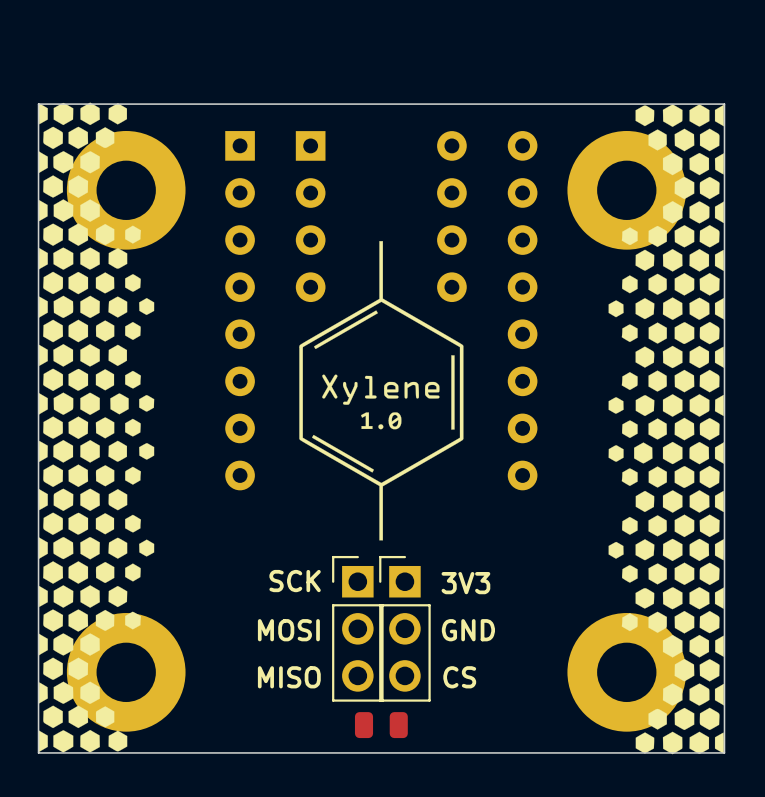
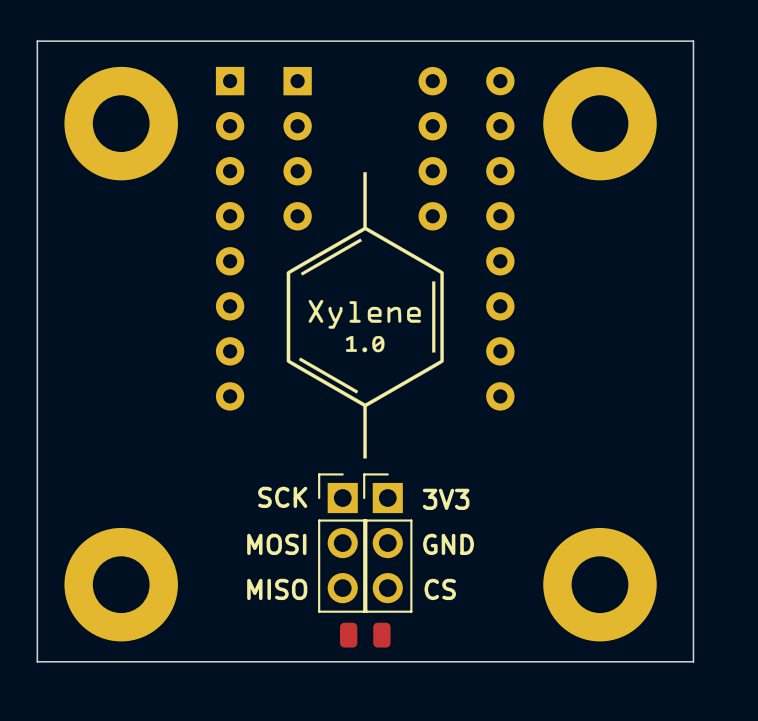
drawing: [38, 102, 155, 753] -> none
drawing: [608, 104, 724, 755] -> none

